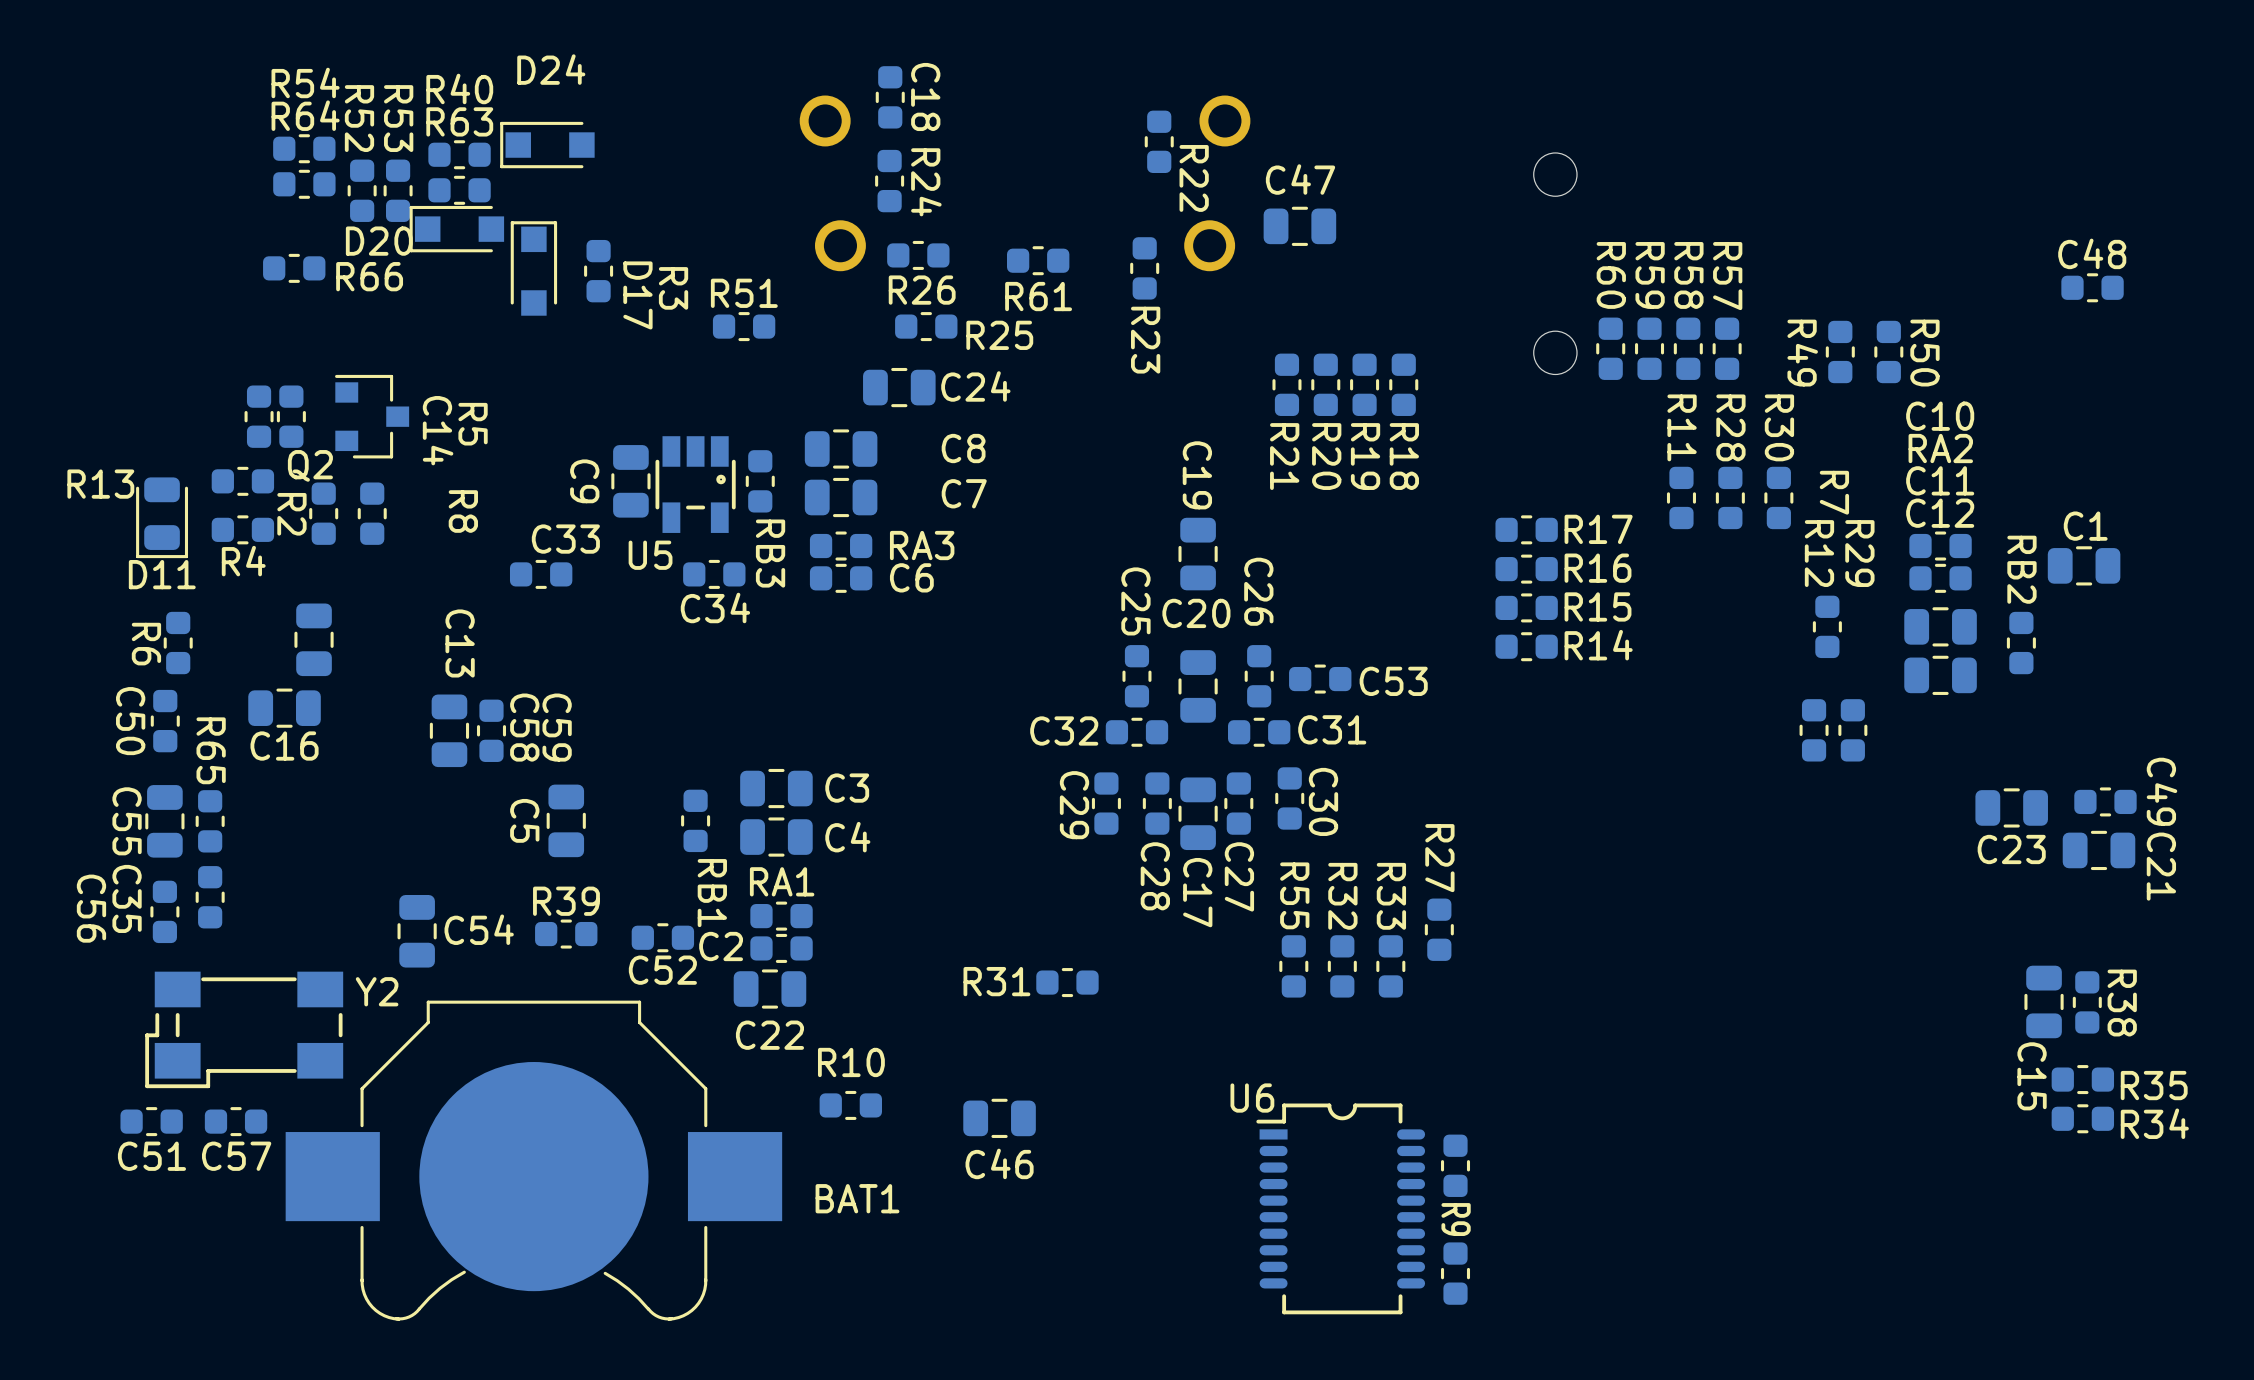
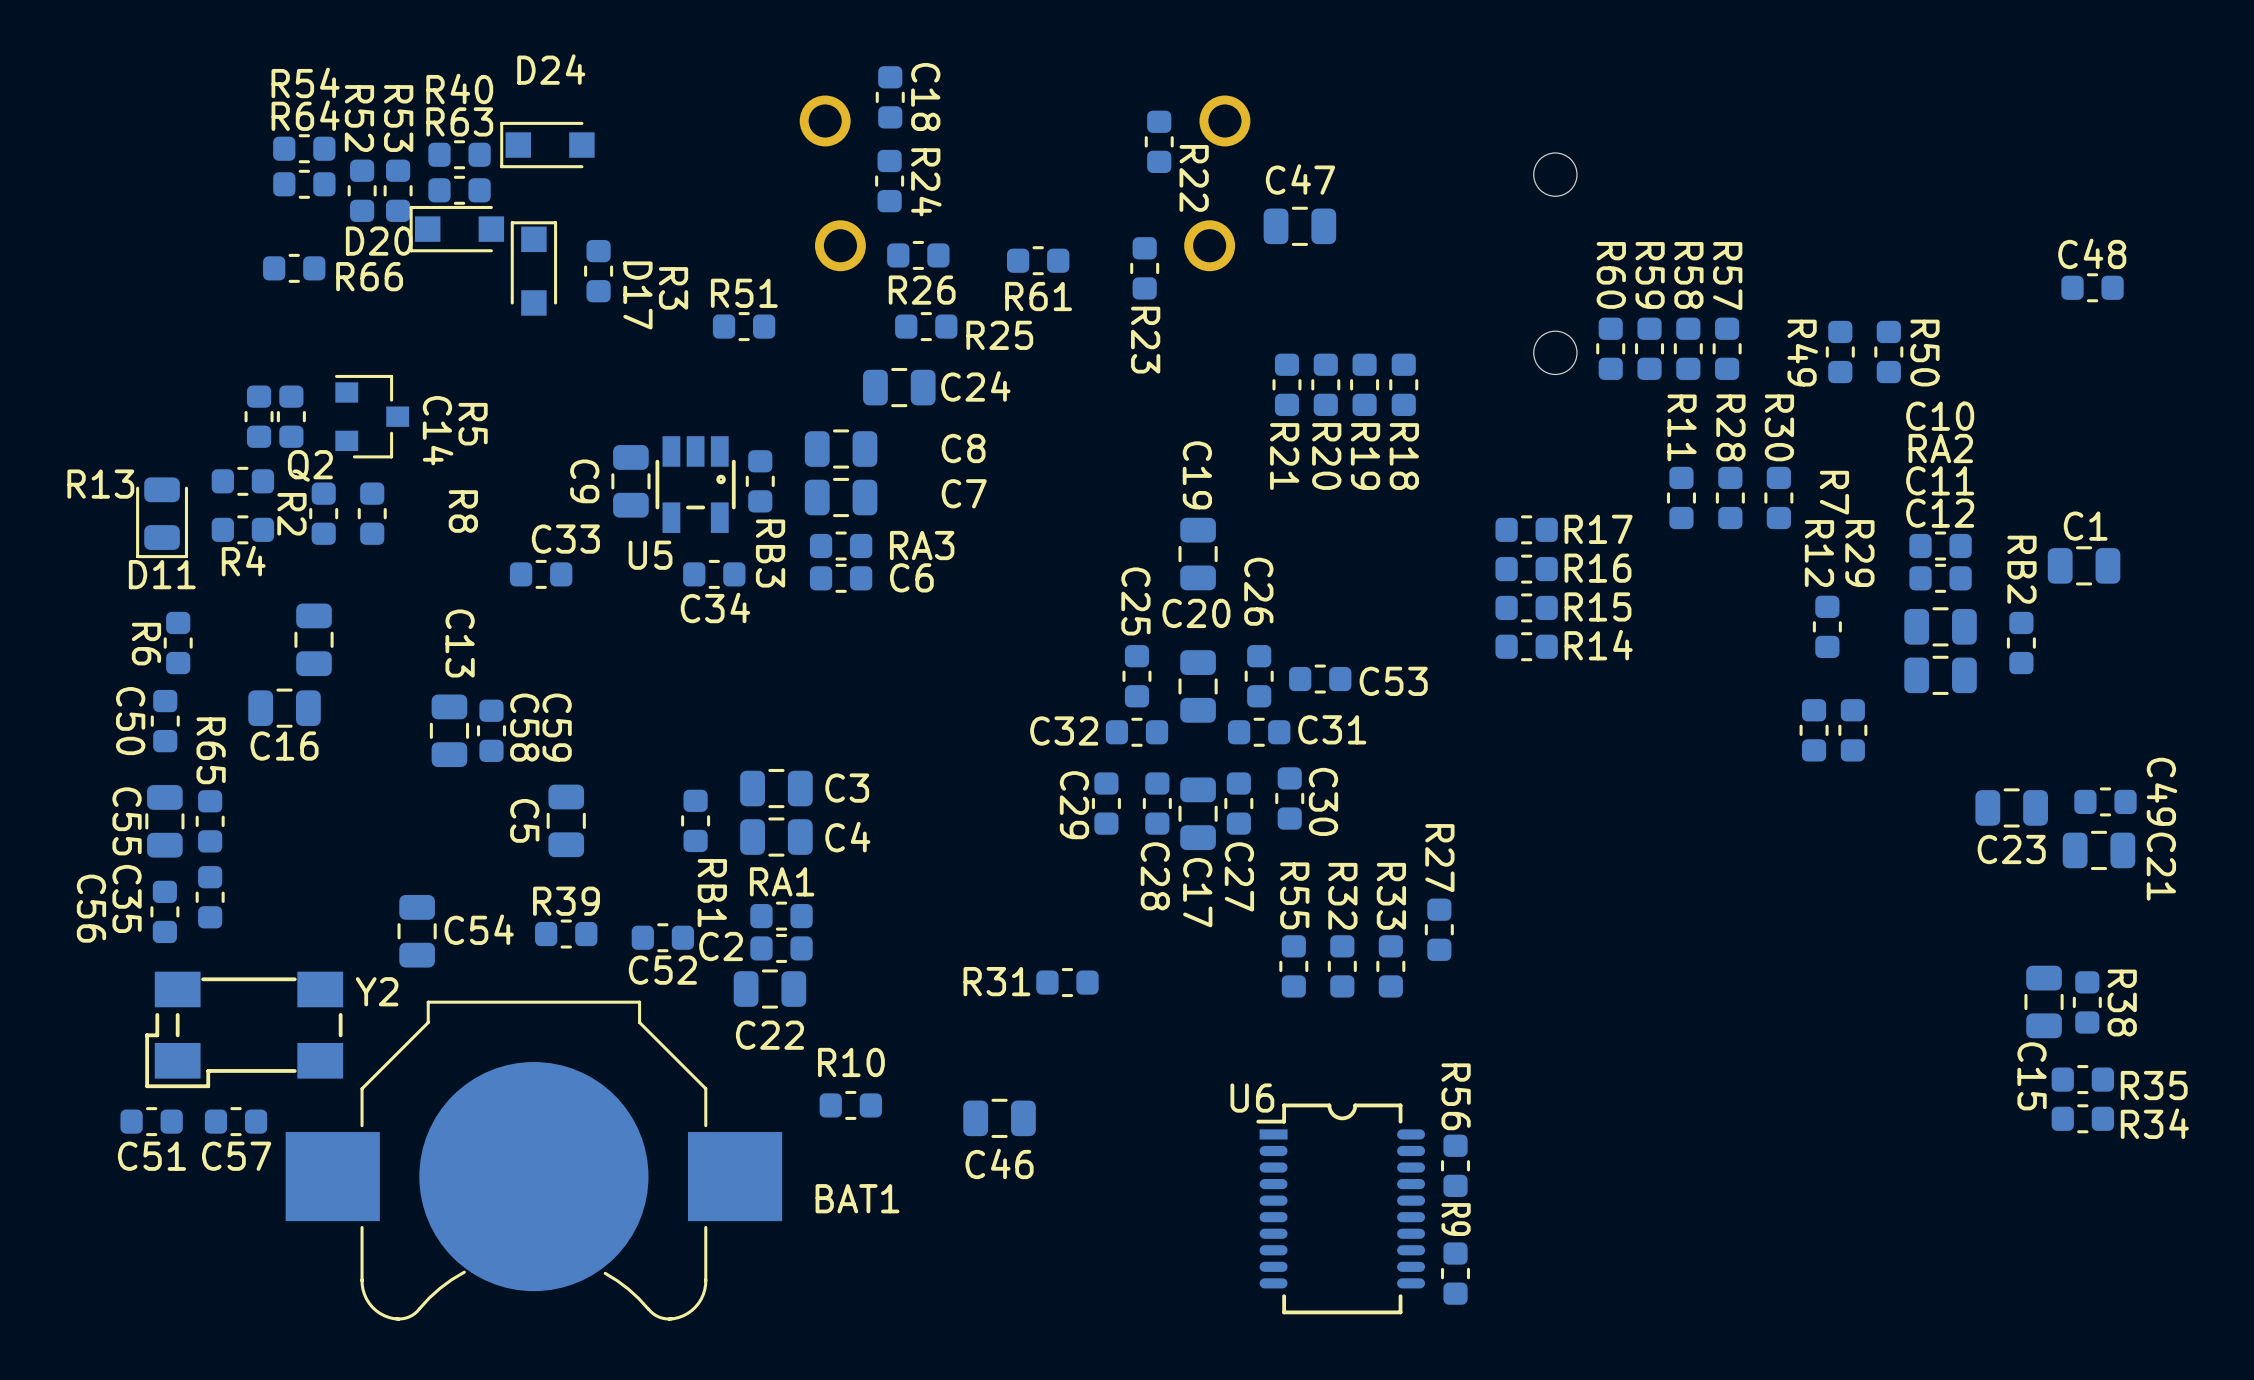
R56 name: none -> R56 (1456, 1096)

